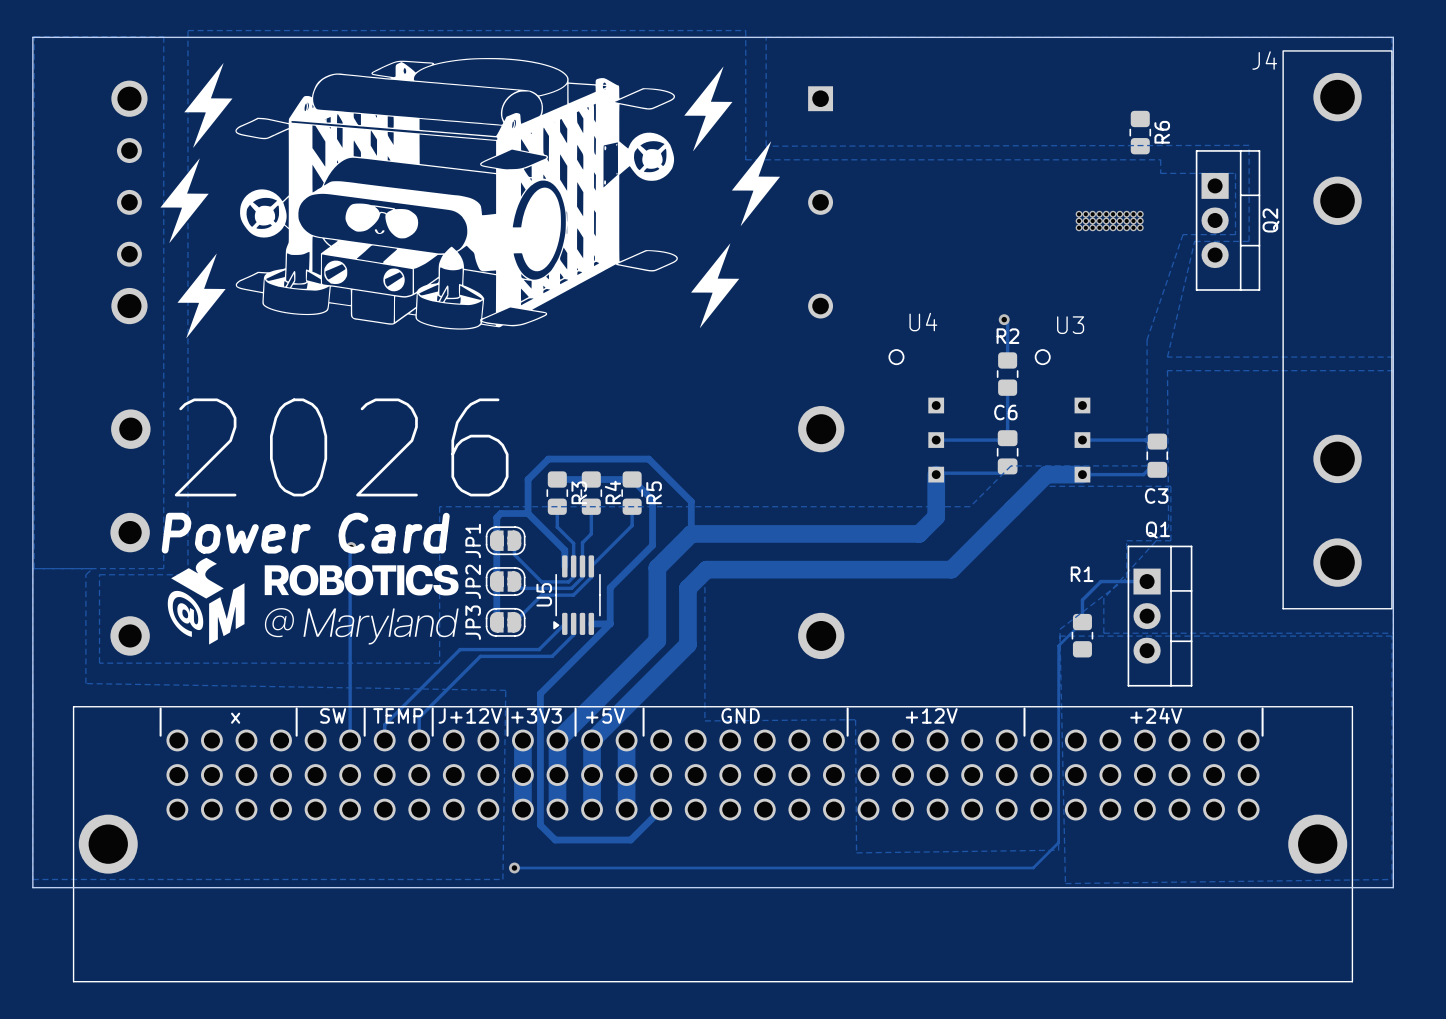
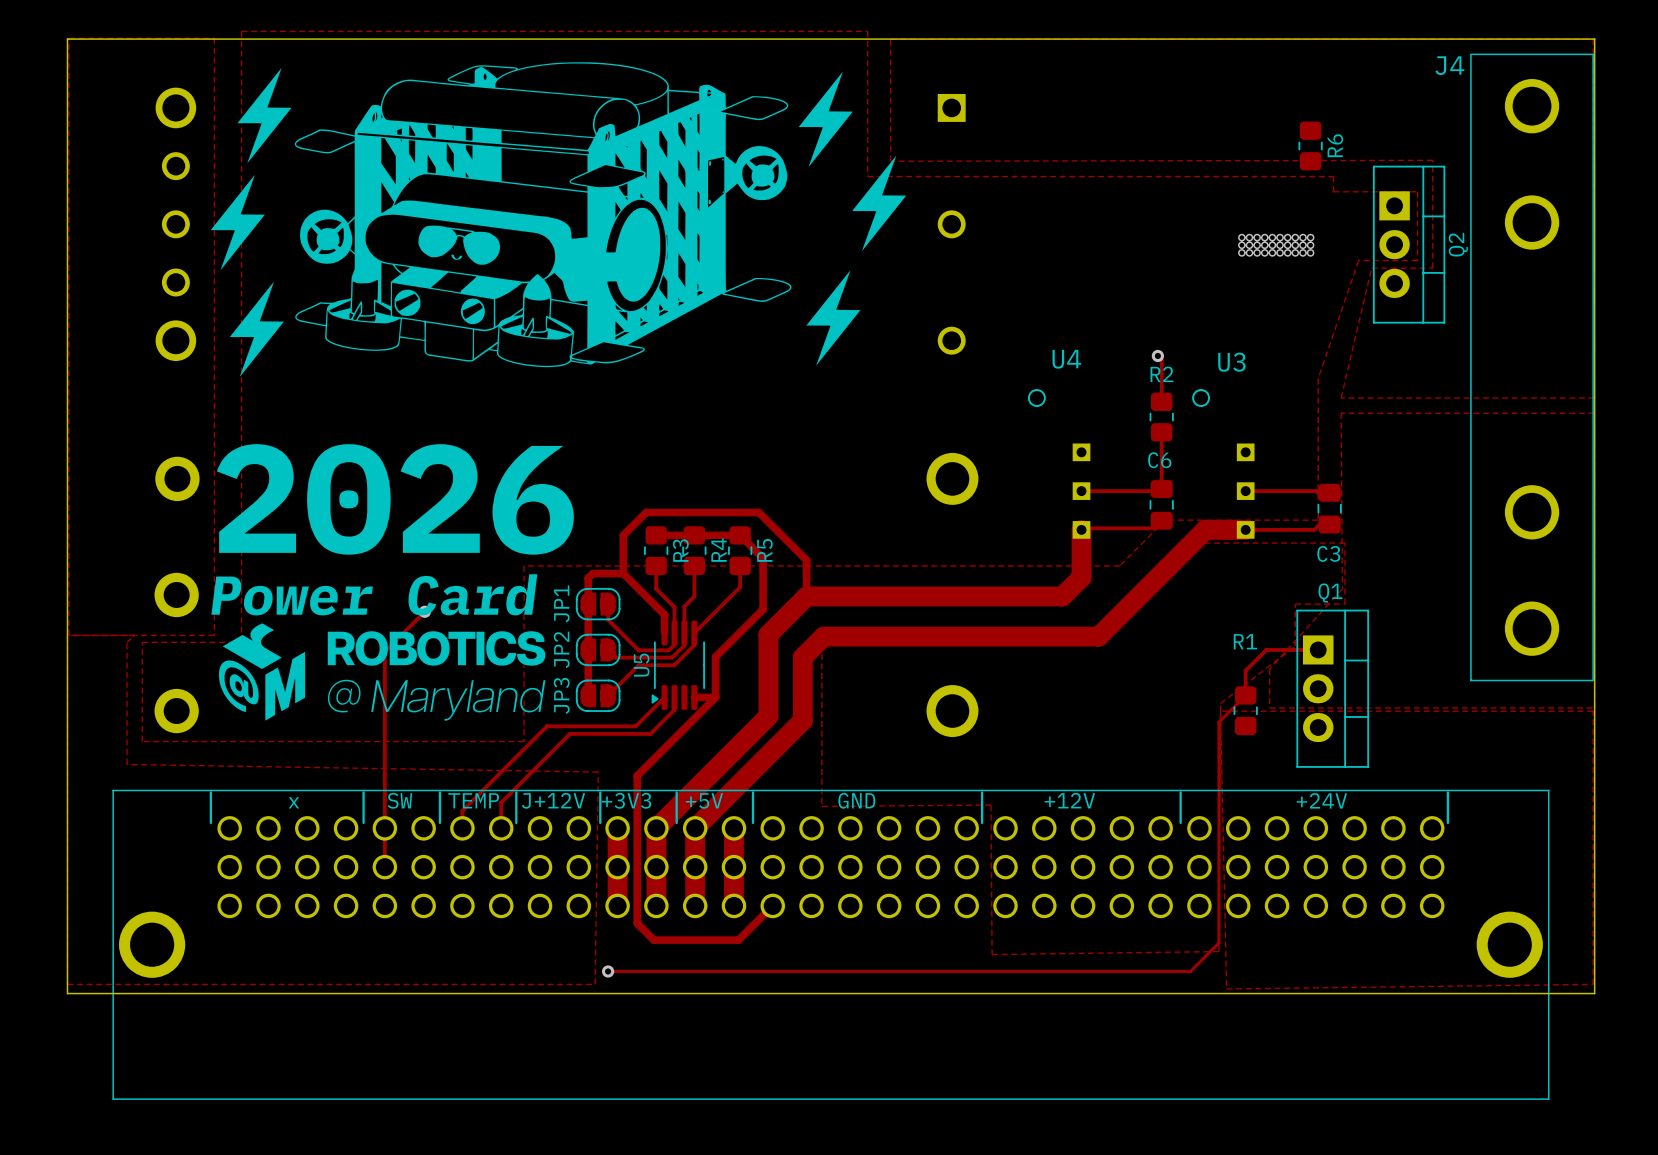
track: (350, 548) (350, 740) -> (423, 612) (384, 651) (384, 867)

